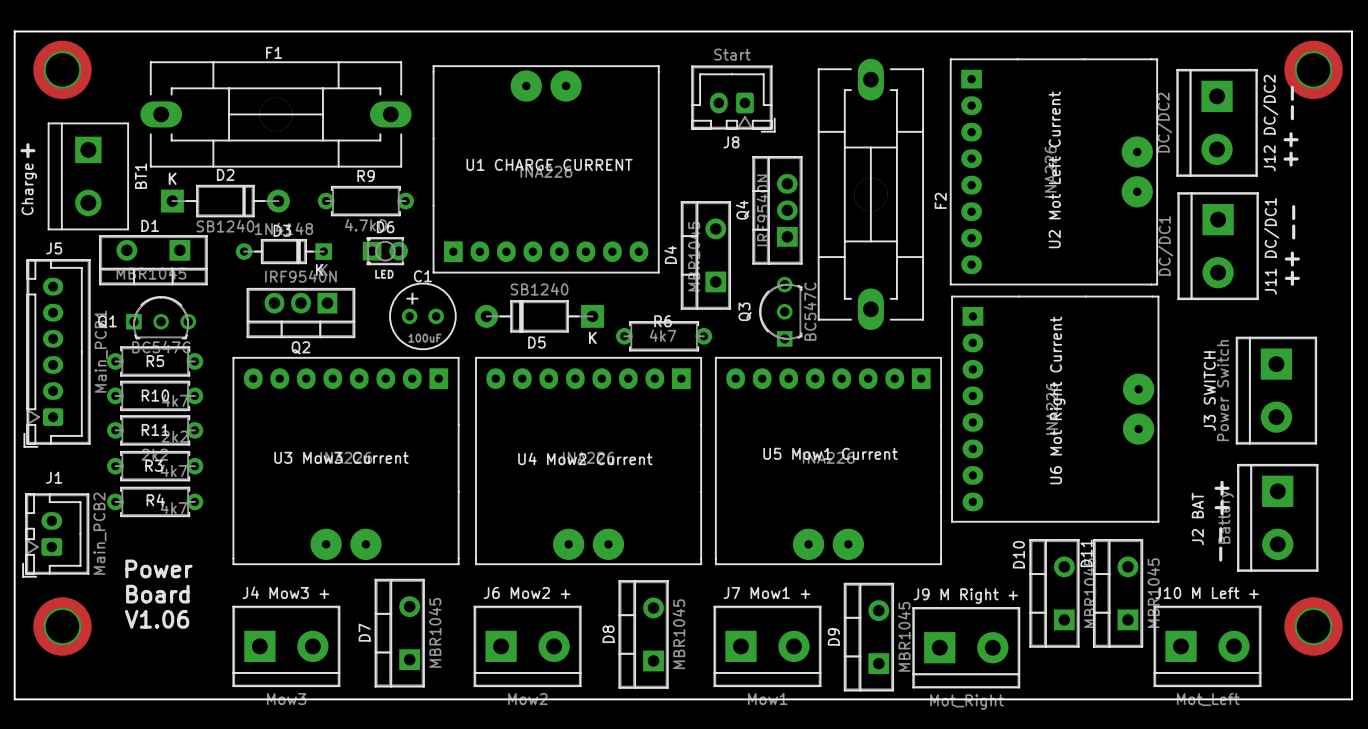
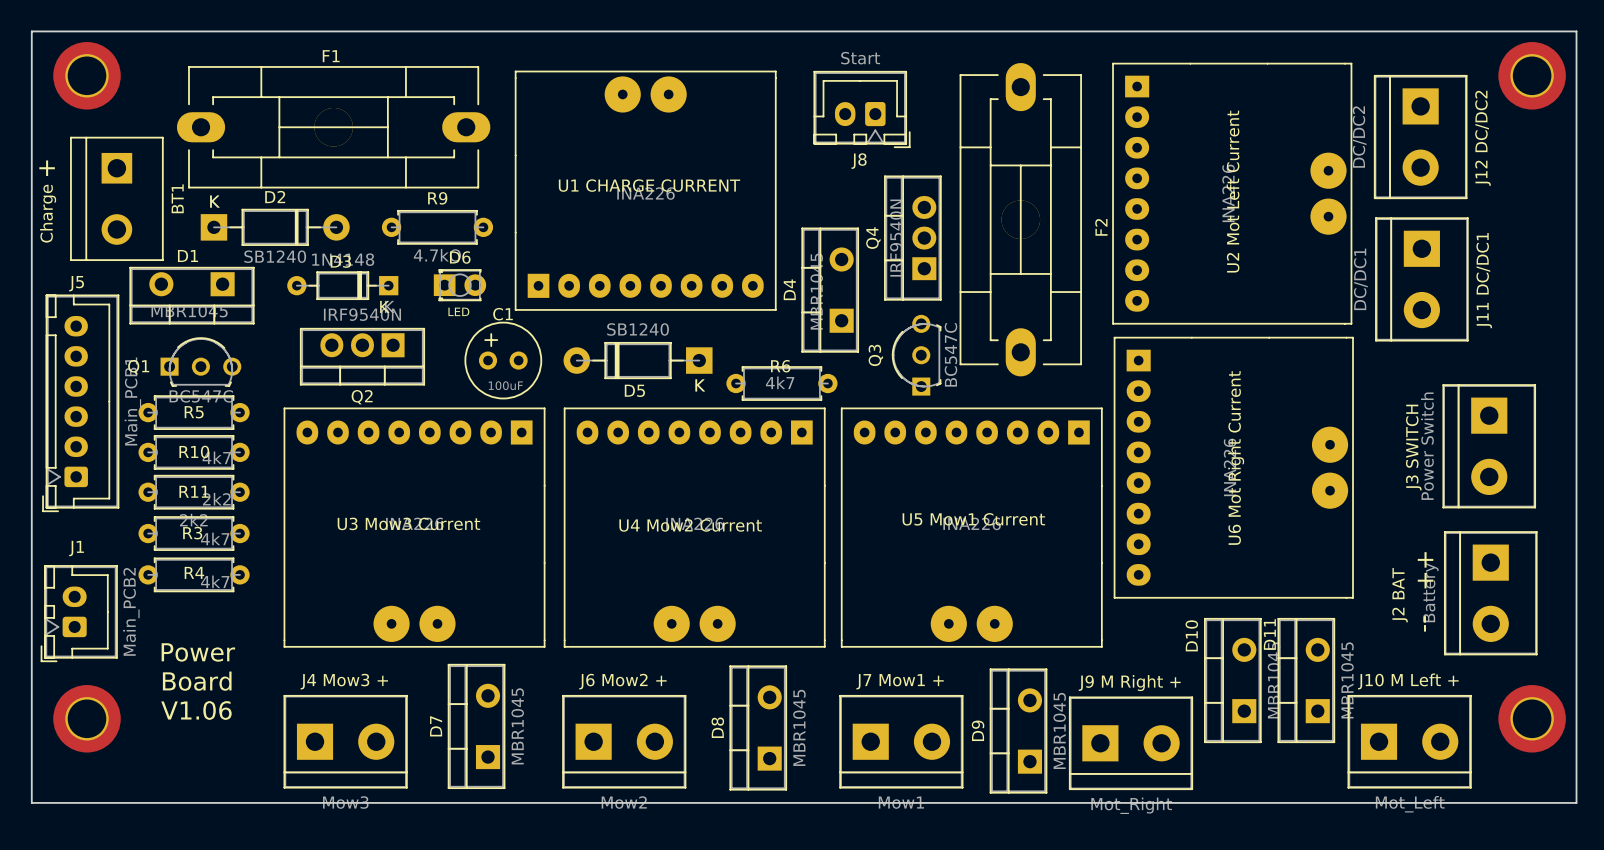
text: -- (1292, 103) -> none
text: ++ (1291, 149) -> none
text: -- (1293, 222) -> none
text: ++ (1292, 268) -> none

